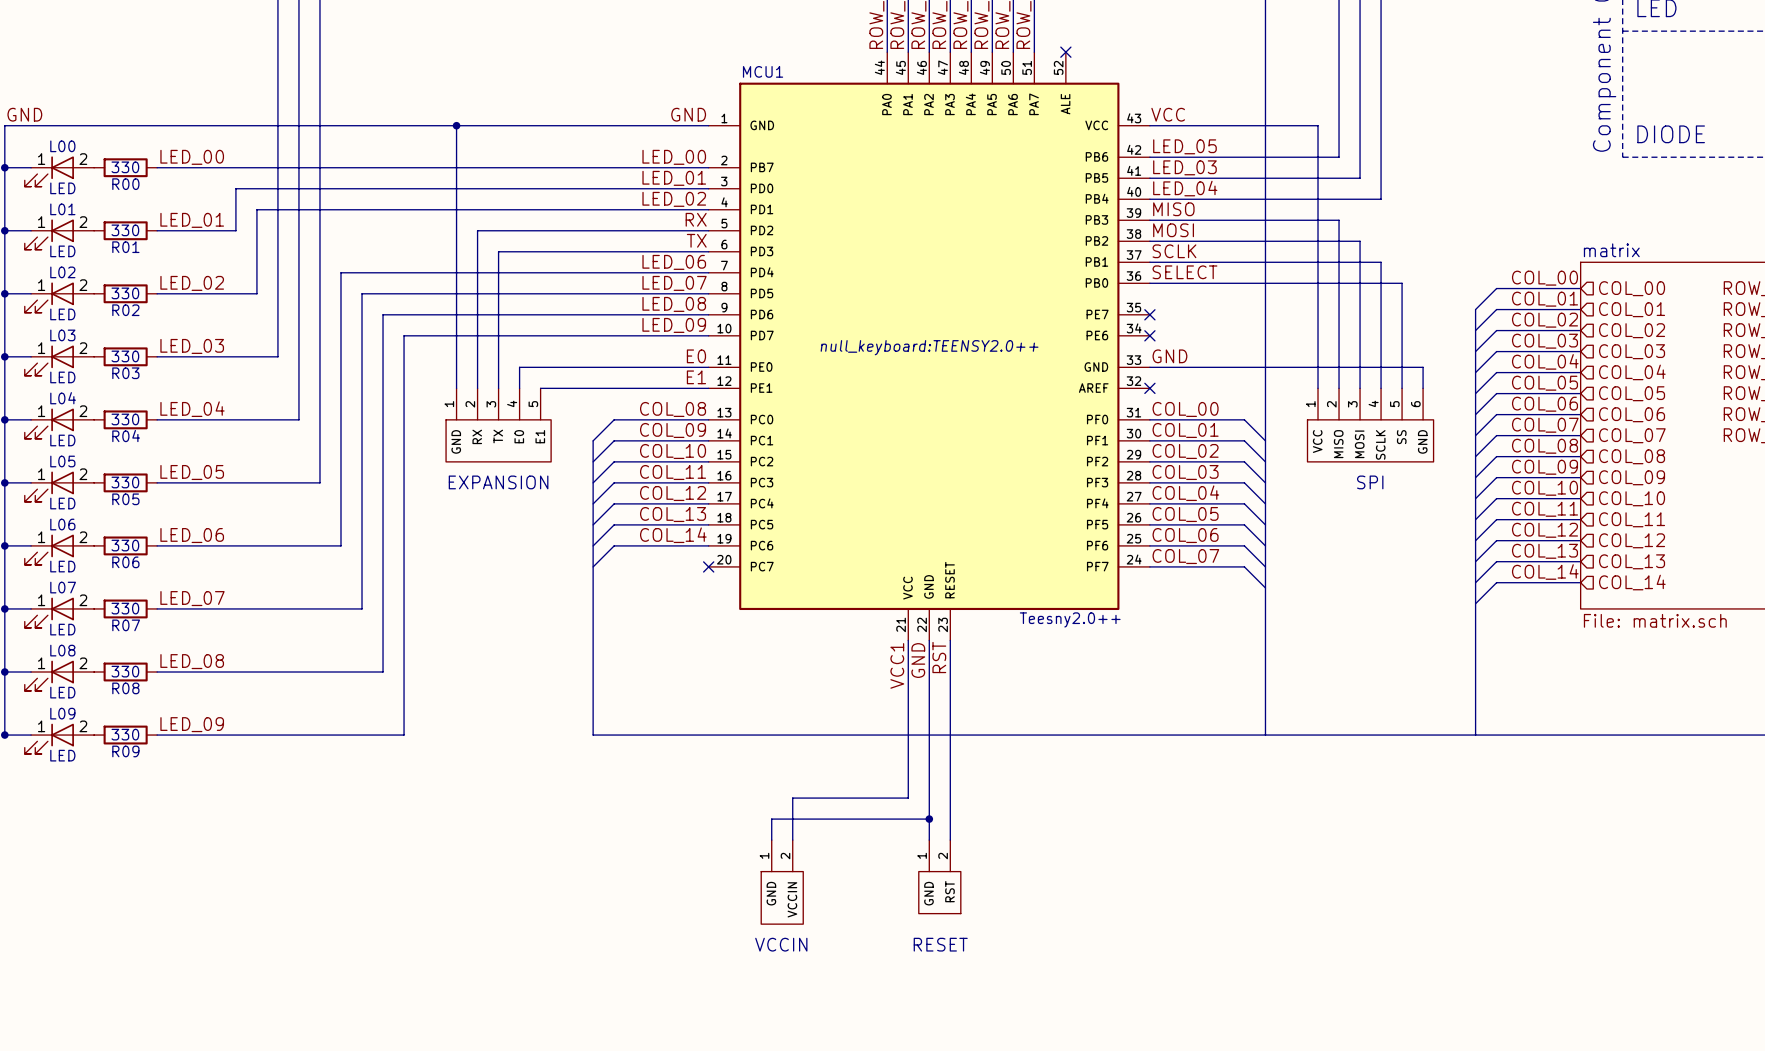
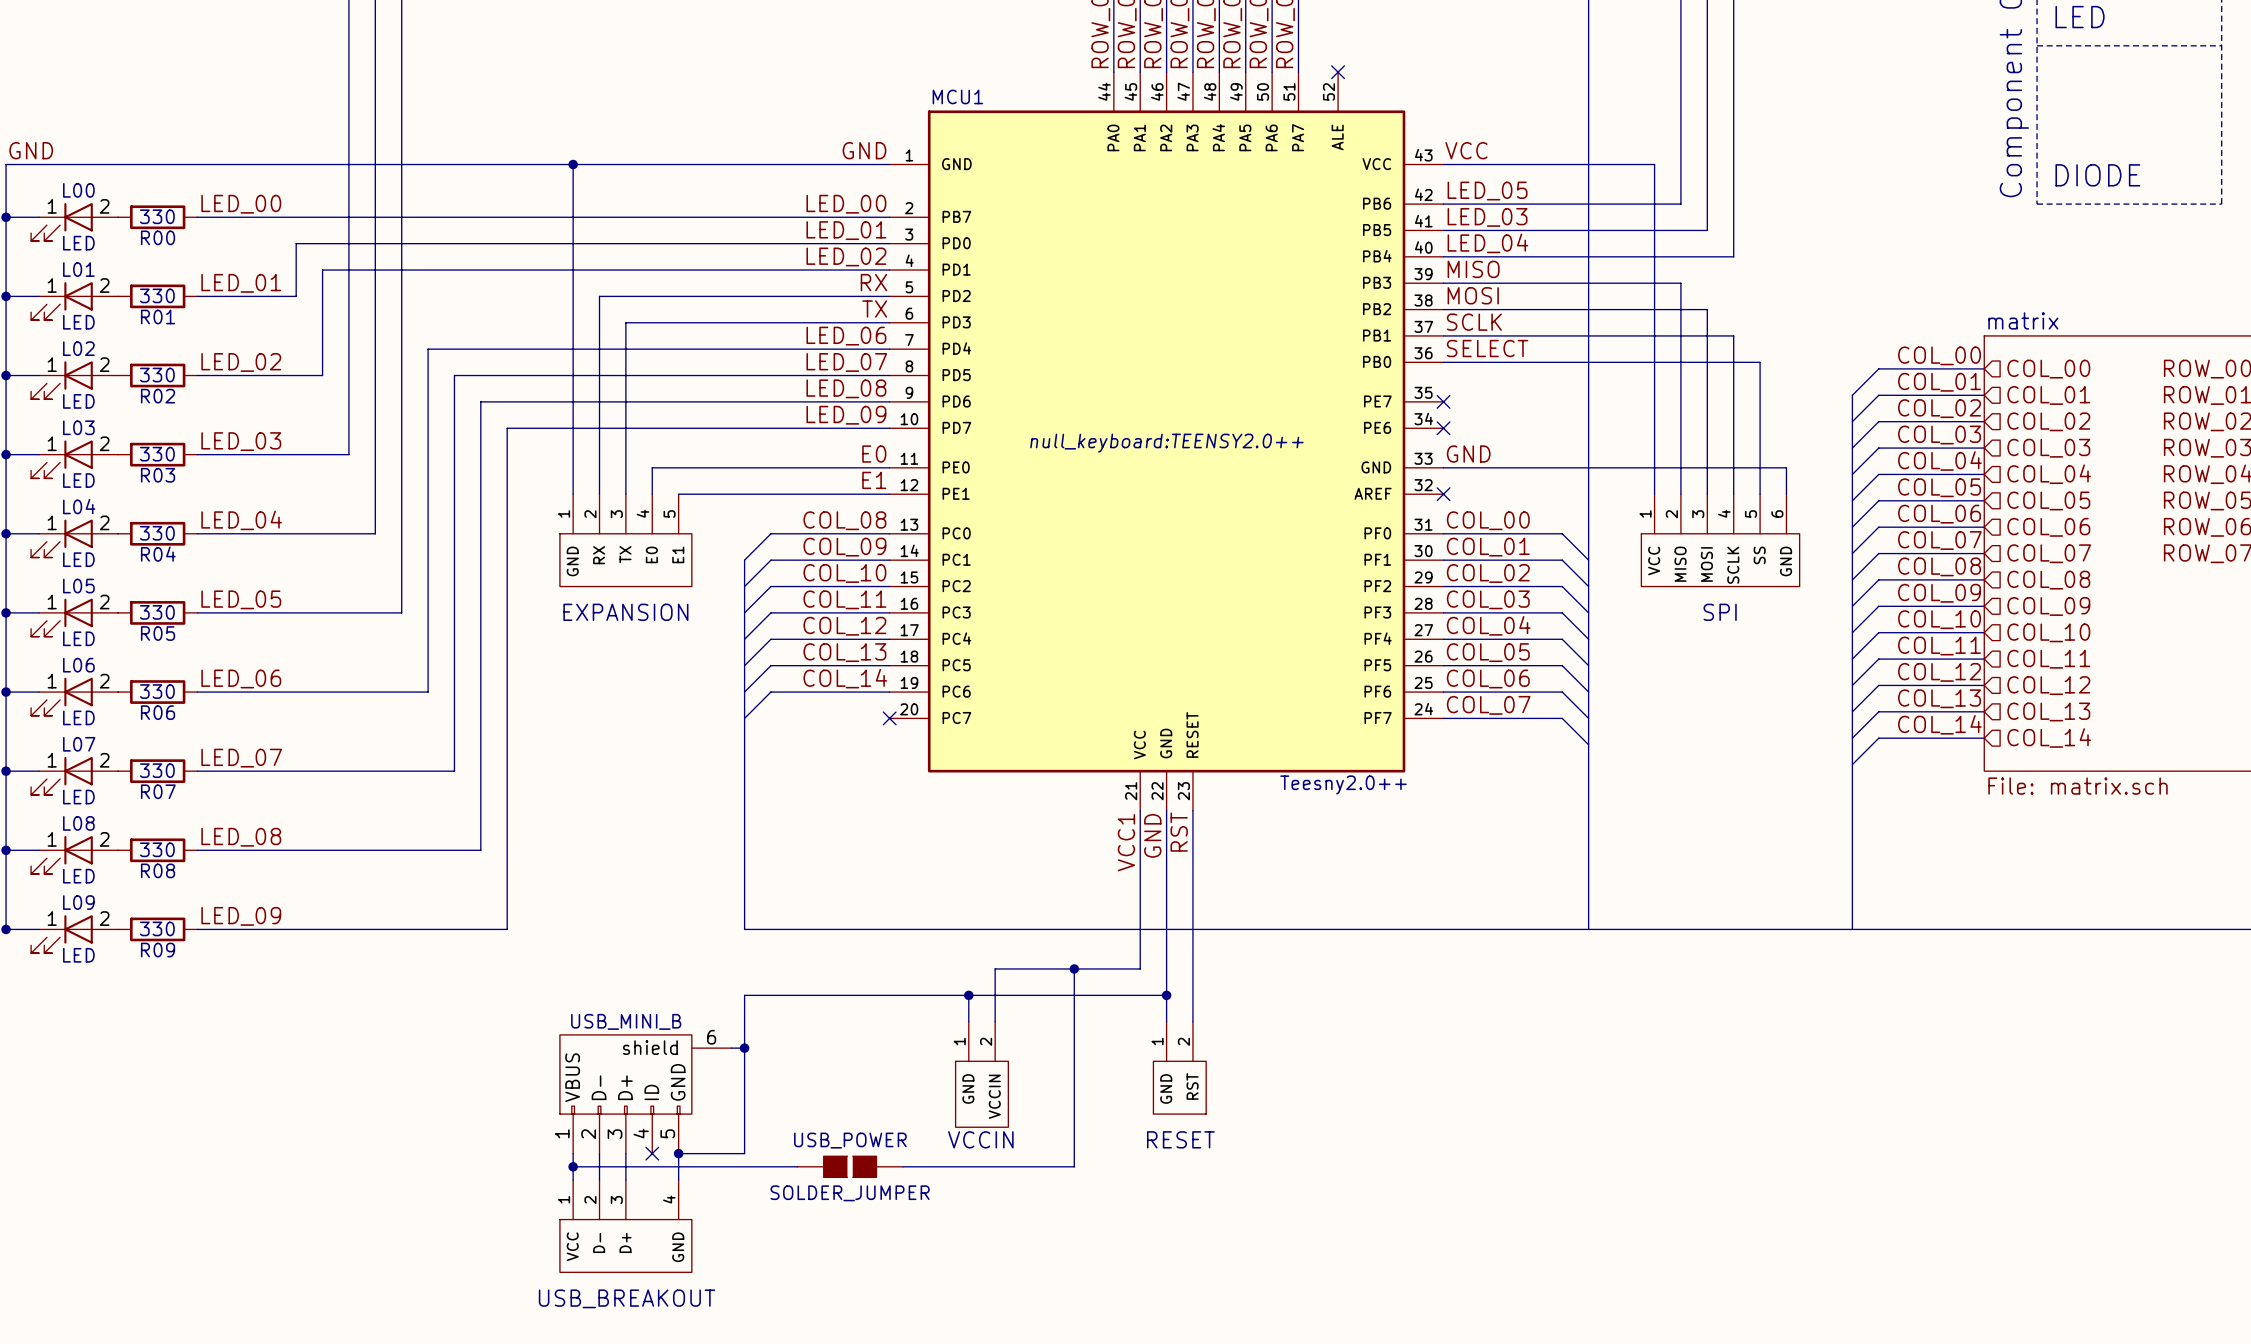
wire: none -> (1074, 968) (1074, 1166) (902, 1166)
junction: none -> (1074, 968)
wire: (908, 766) (908, 798) (792, 798) -> (1140, 968) (995, 968) (995, 1008)
wire: none -> (968, 995) (968, 1021)
junction: none -> (968, 995)
wire: none -> (1166, 995) (744, 995) (744, 1153) (678, 1153) (678, 1180)
wire: (929, 819) (771, 819) (771, 840) -> none
junction position: (929, 819) -> (1166, 995)
wire: none -> (731, 1048) (744, 1048)
junction: none -> (744, 1048)
part: none -> USB_MINI_B (645, 1094)
part position: (939, 876) -> (1179, 1067)
part position: (782, 882) -> (981, 1074)
wire: none -> (573, 1153) (573, 1180)
wire: none -> (599, 1153) (599, 1180)
wire: none -> (625, 1153) (625, 1180)
no-connect mark: none -> (652, 1153)
junction: none -> (678, 1153)
wire: none -> (573, 1166) (797, 1166)
junction: none -> (573, 1166)
USB_POWER: none -> SOLDER_JUMPER (850, 1166)
part value position: VCCIN (781, 944) -> VCCIN (980, 1139)
part value position: RESET (940, 944) -> RESET (1180, 1139)
part: none -> USB_BREAKOUT (625, 1226)

